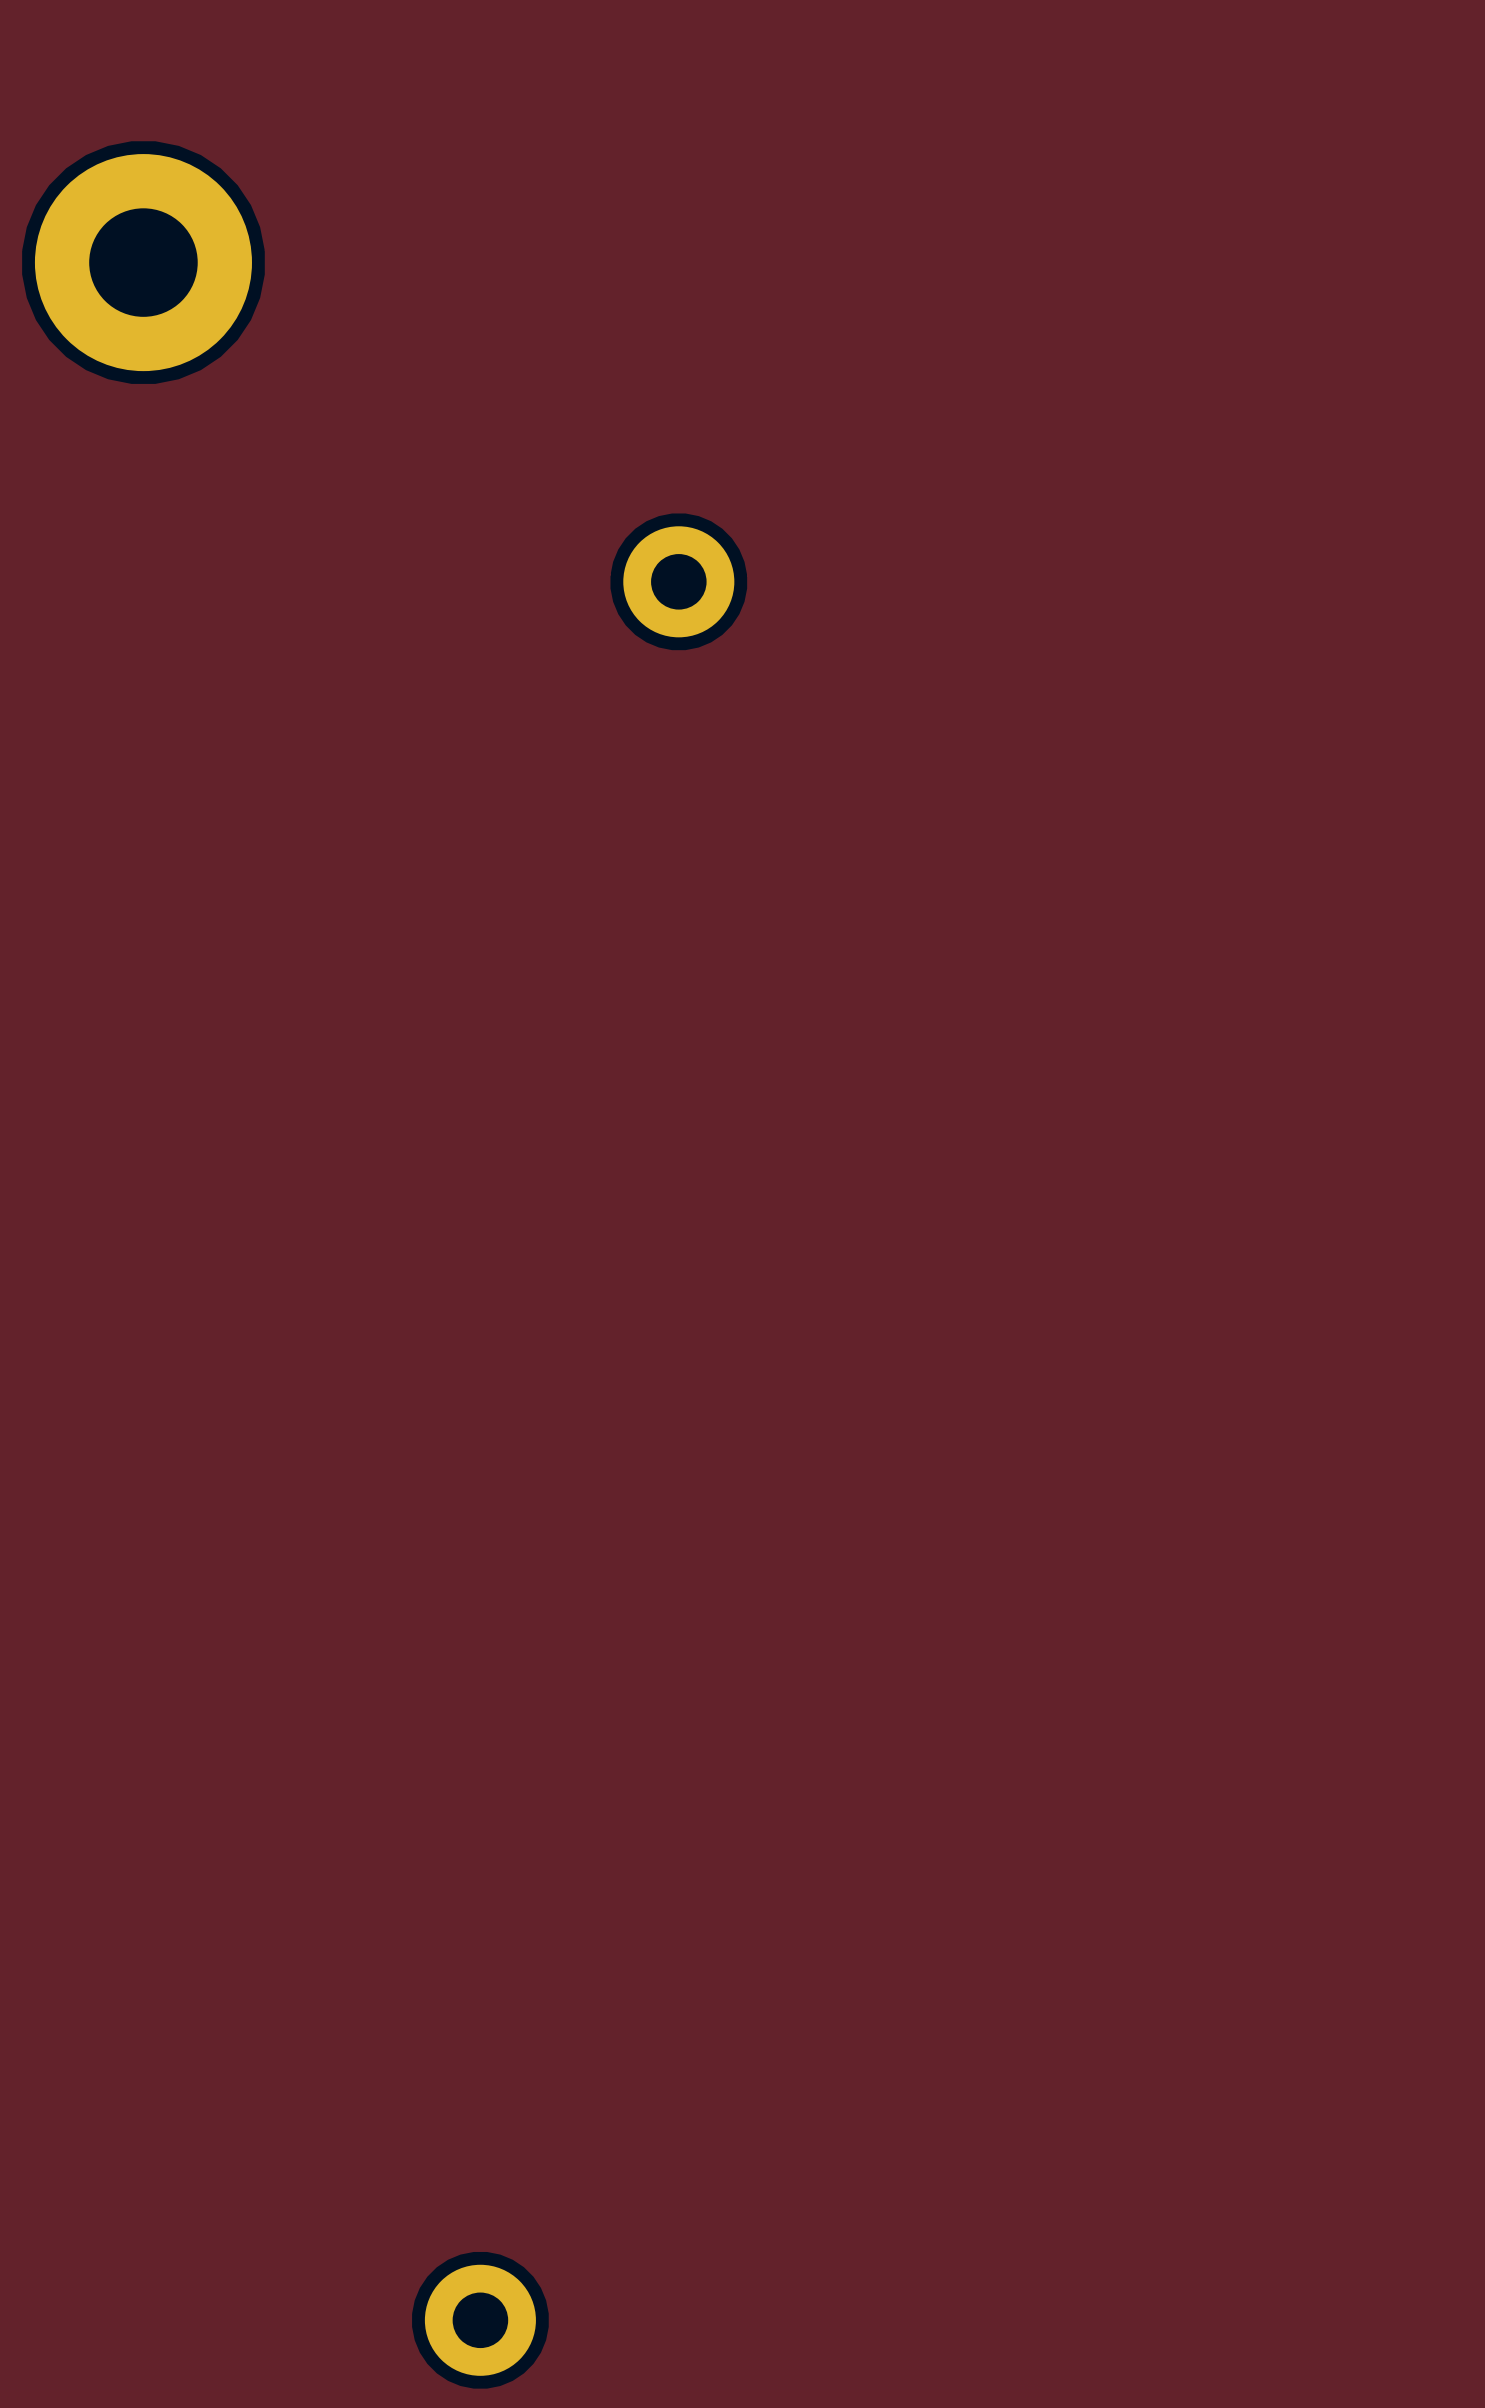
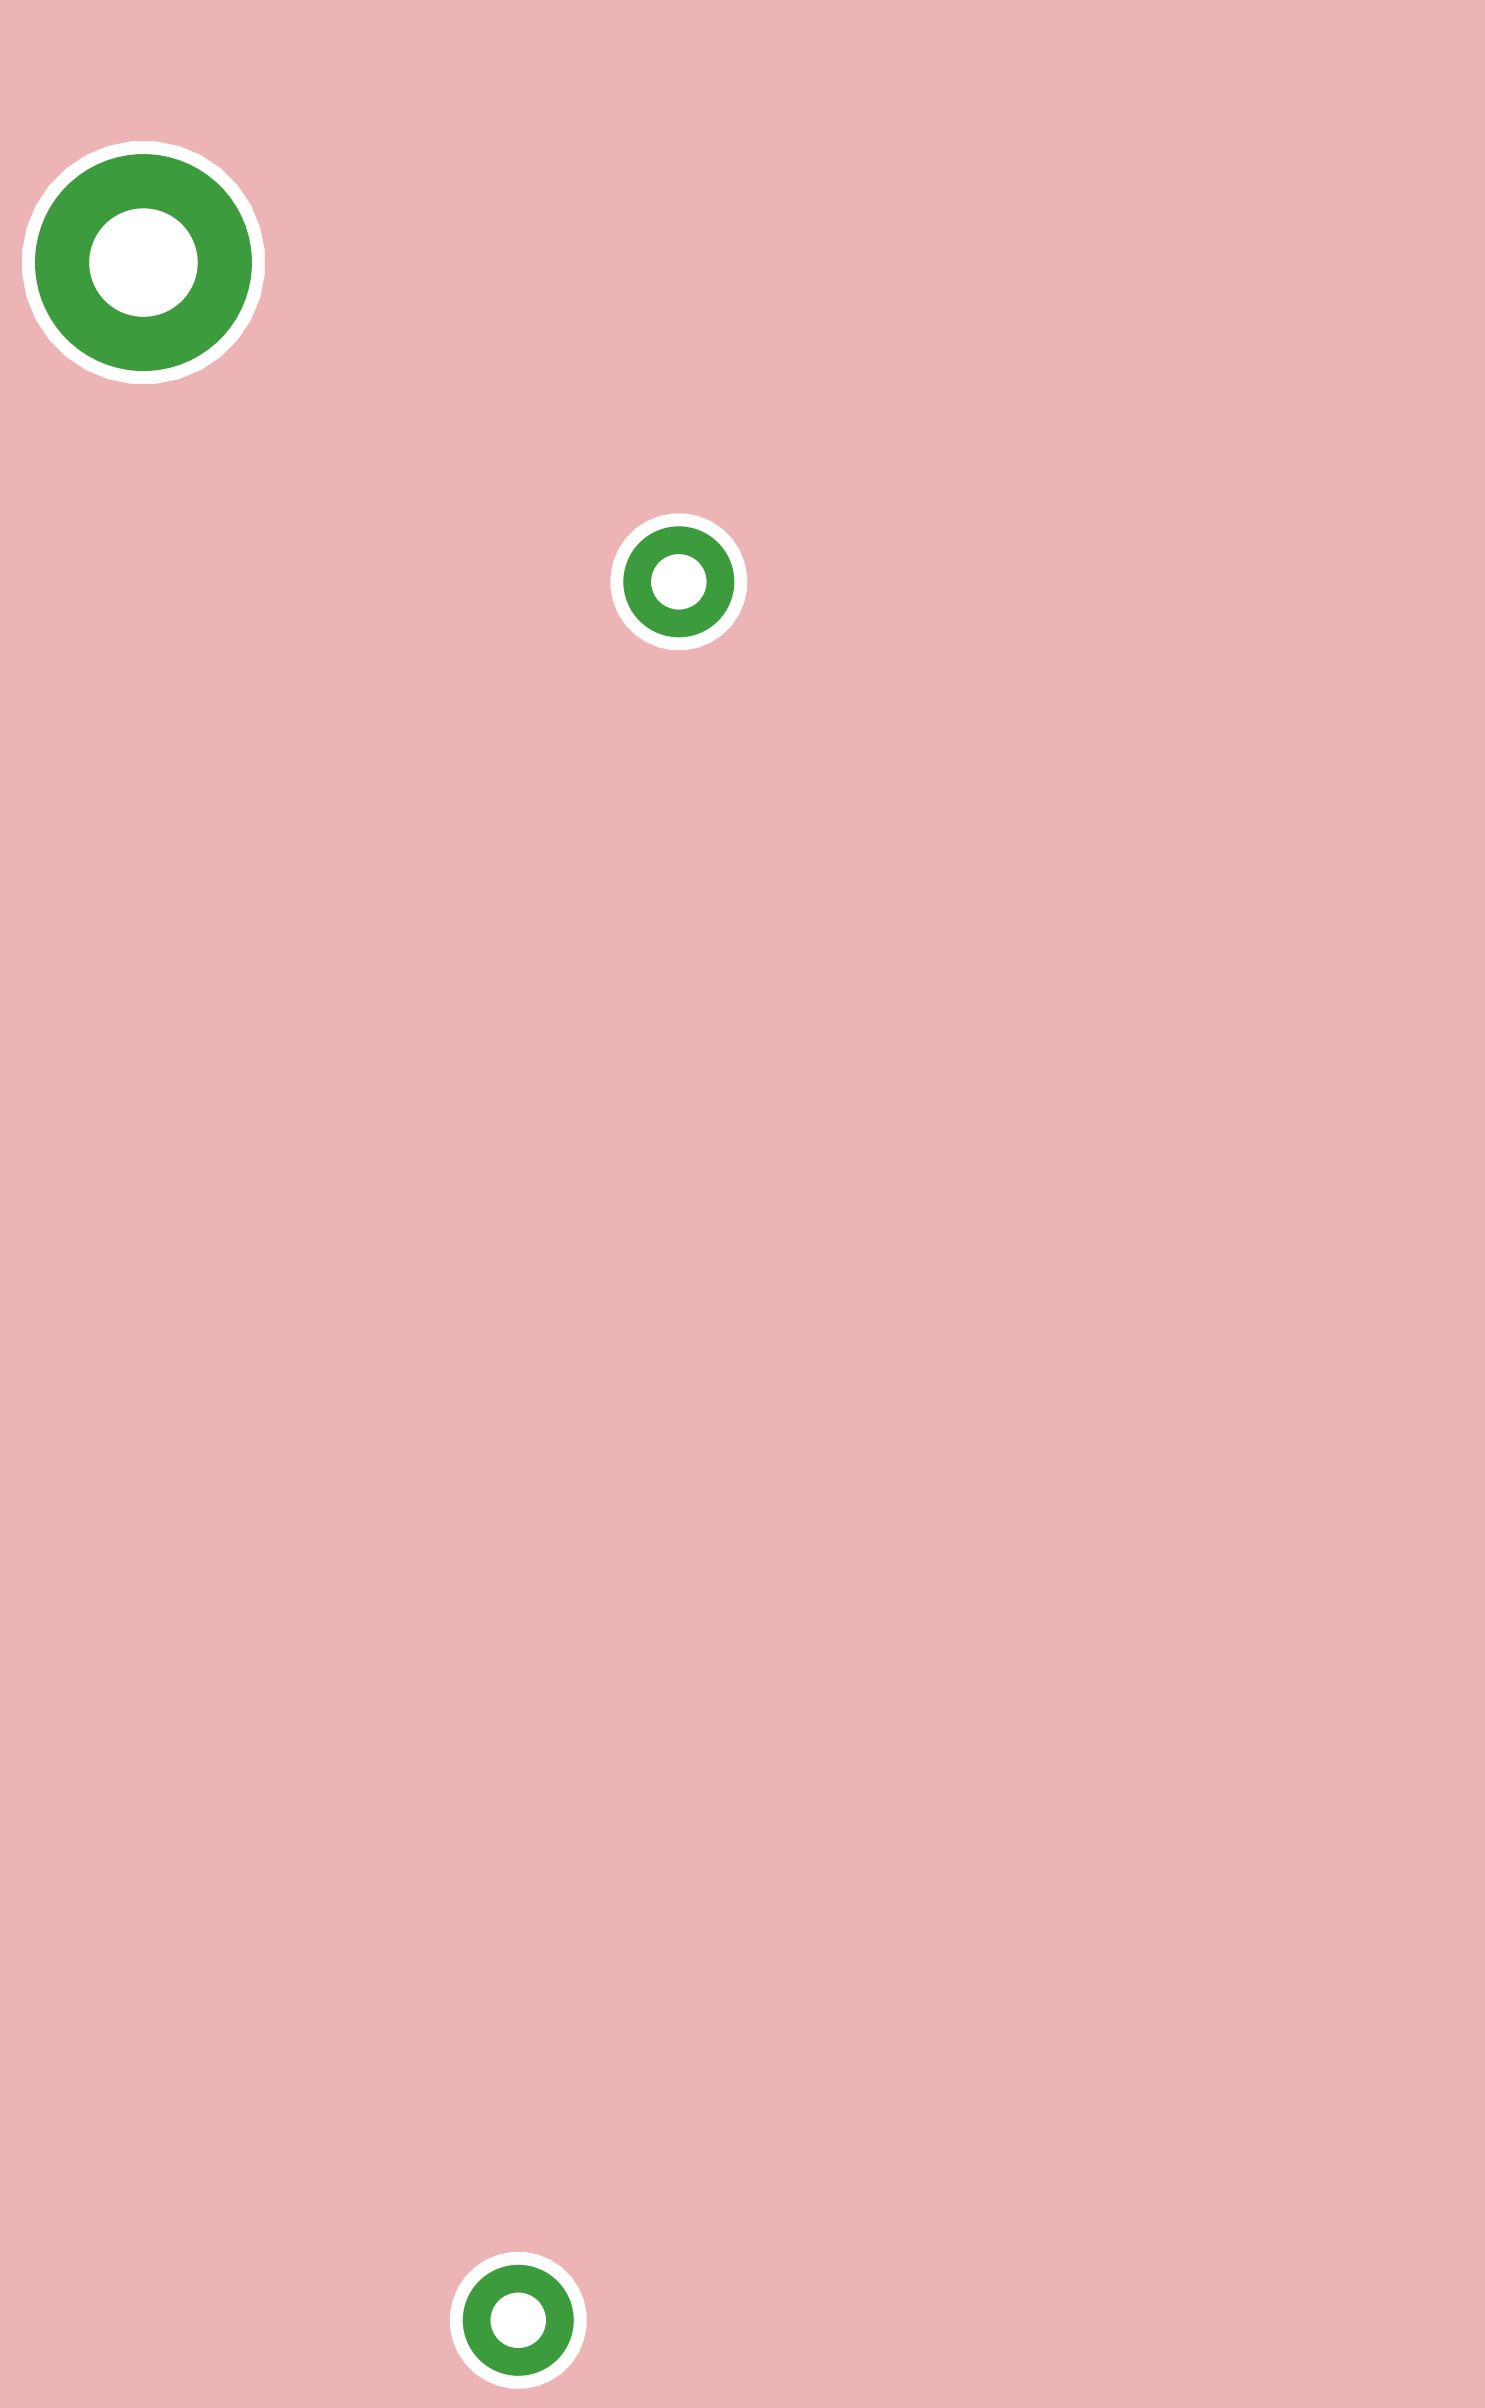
part position: (480, 2320) -> (518, 2320)

